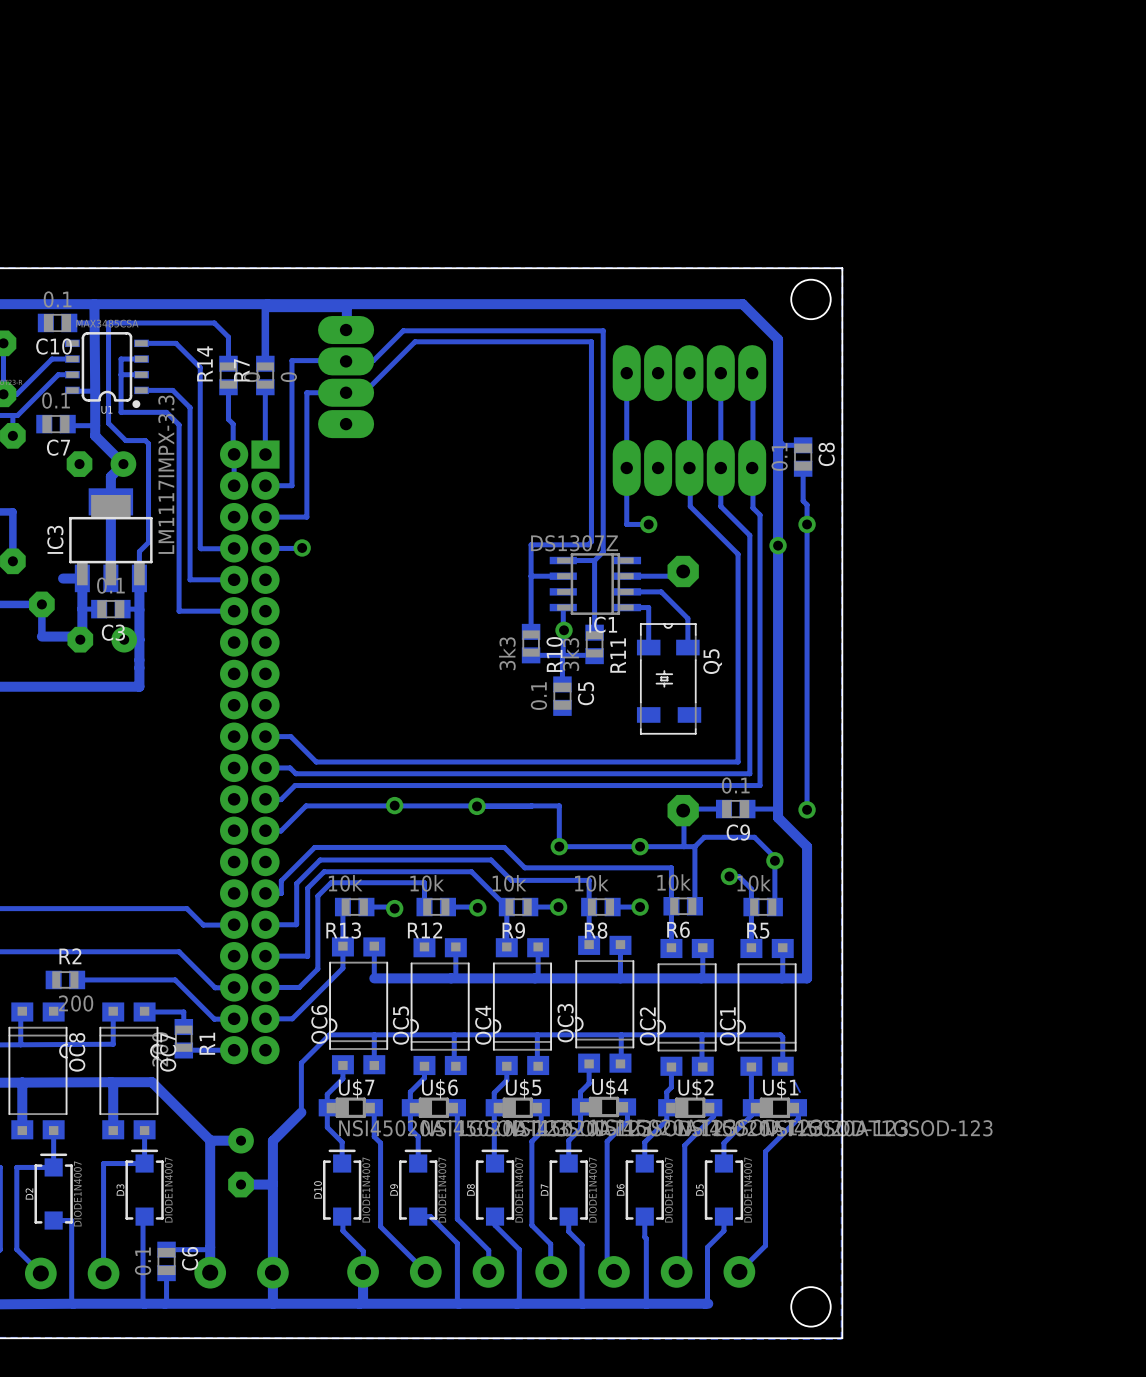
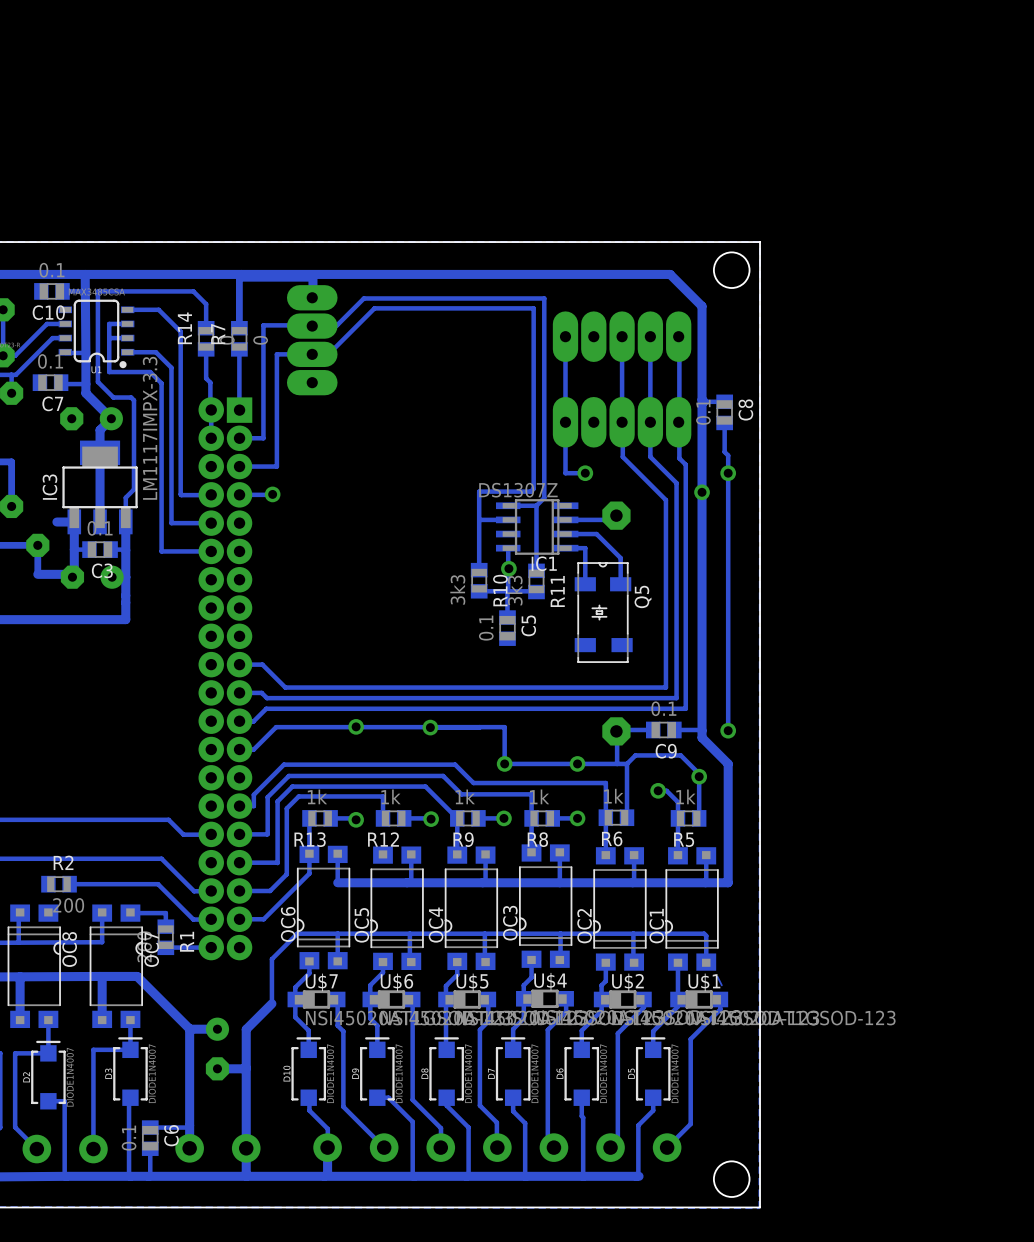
R6 value: 10k (674, 882) -> 1k (613, 796)
R13 value: 10k (345, 883) -> 1k (317, 796)
R12 value: 10k (427, 883) -> 1k (391, 796)
R9 value: 10k (509, 883) -> 1k (465, 796)
R8 value: 10k (591, 883) -> 1k (539, 796)
R5 value: 10k (754, 883) -> 1k (685, 796)

